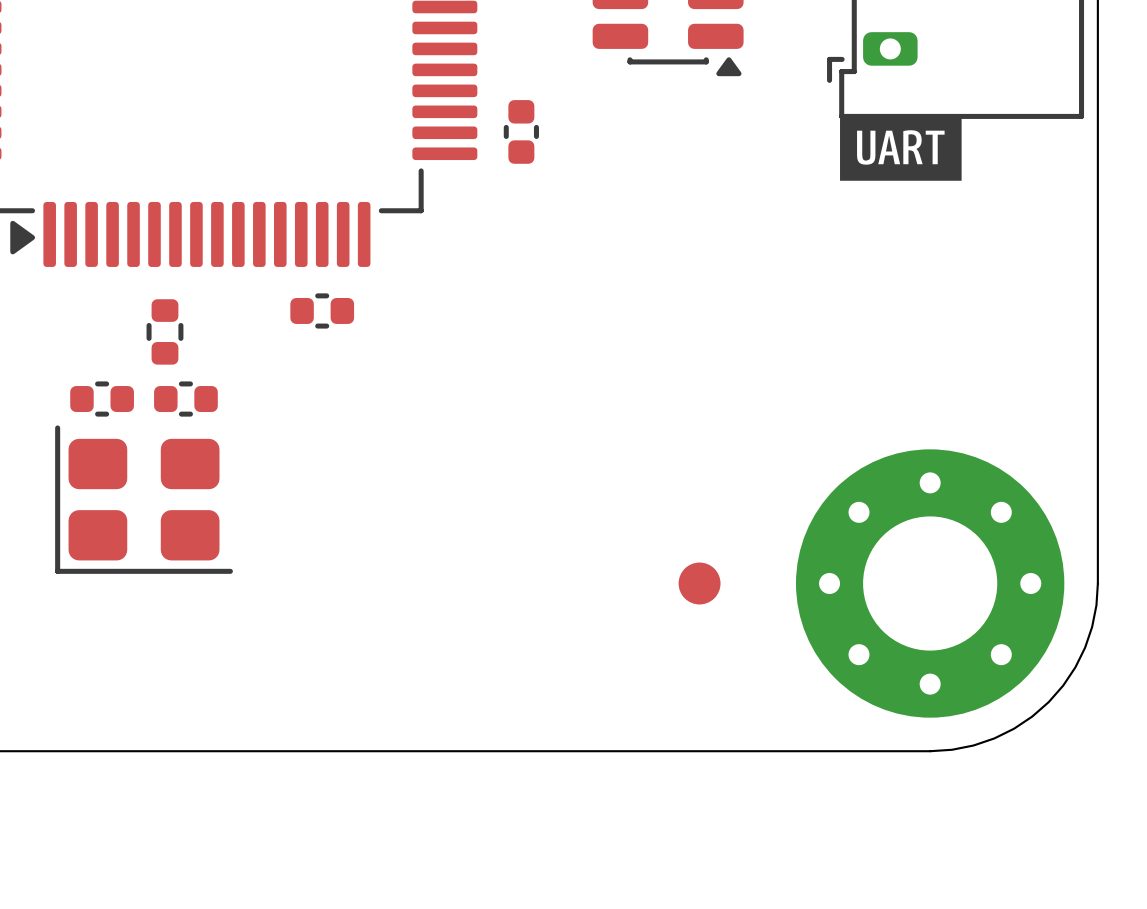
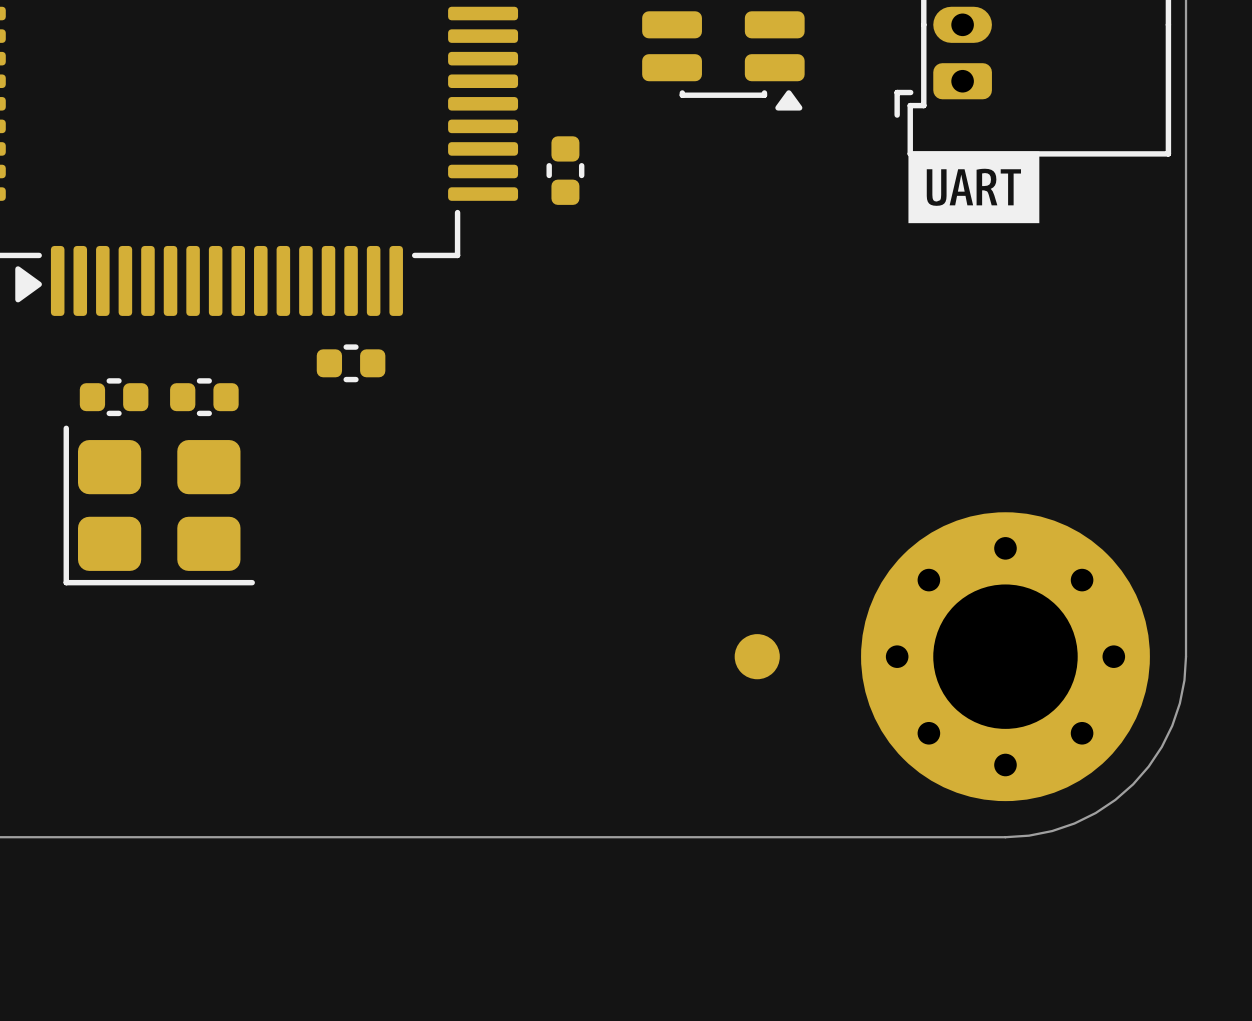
part footprint: [146, 299, 184, 365] -> [170, 378, 239, 417]
part: none -> (114, 397)
part: (102, 399) -> none
part: (185, 399) -> none
part position: (144, 499) -> (159, 505)

